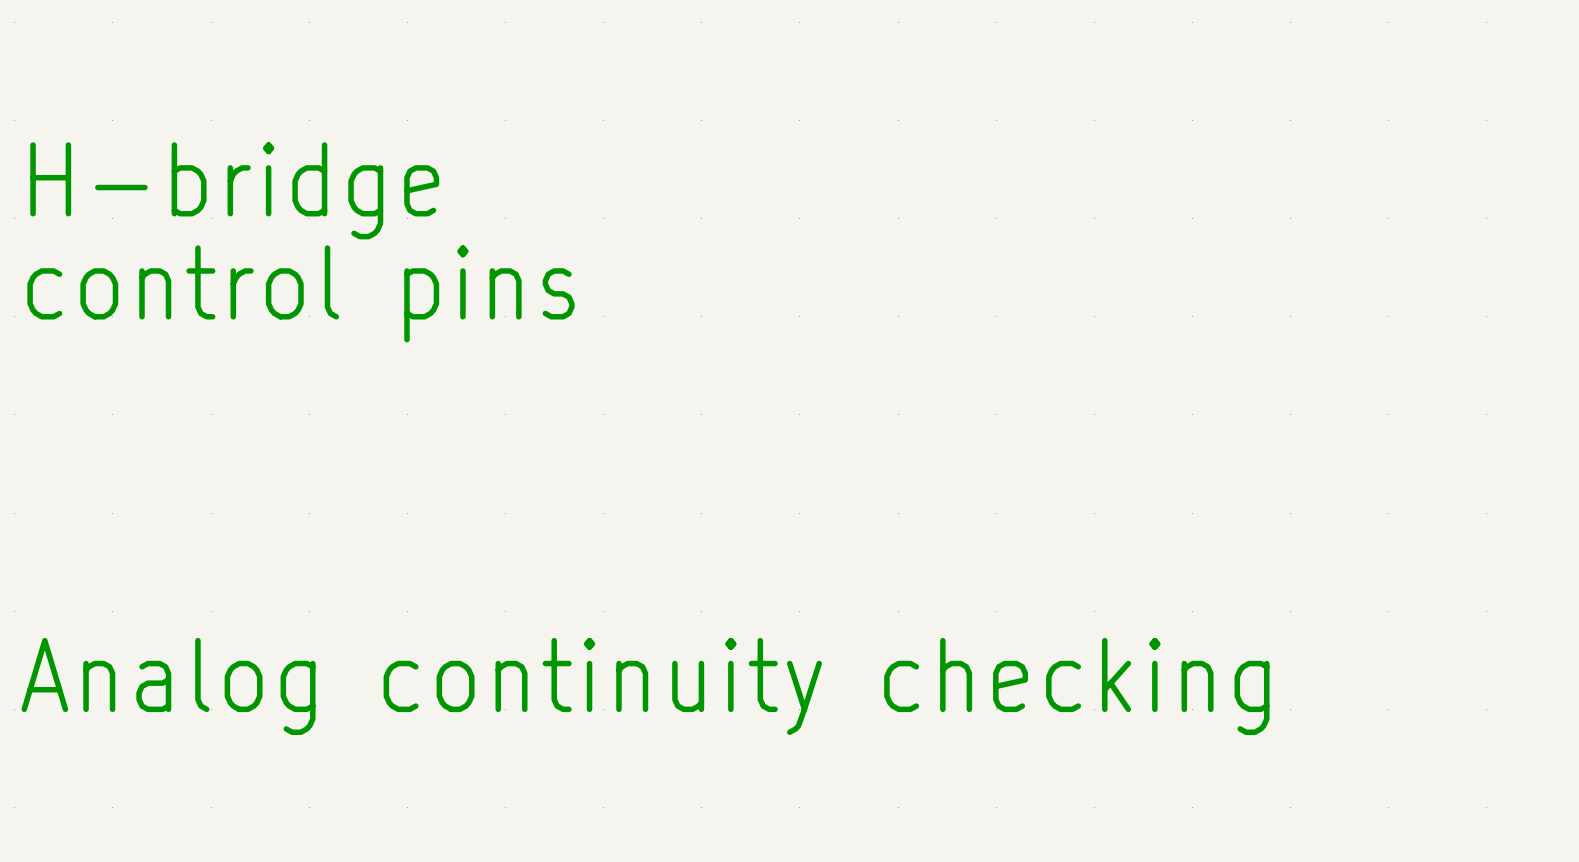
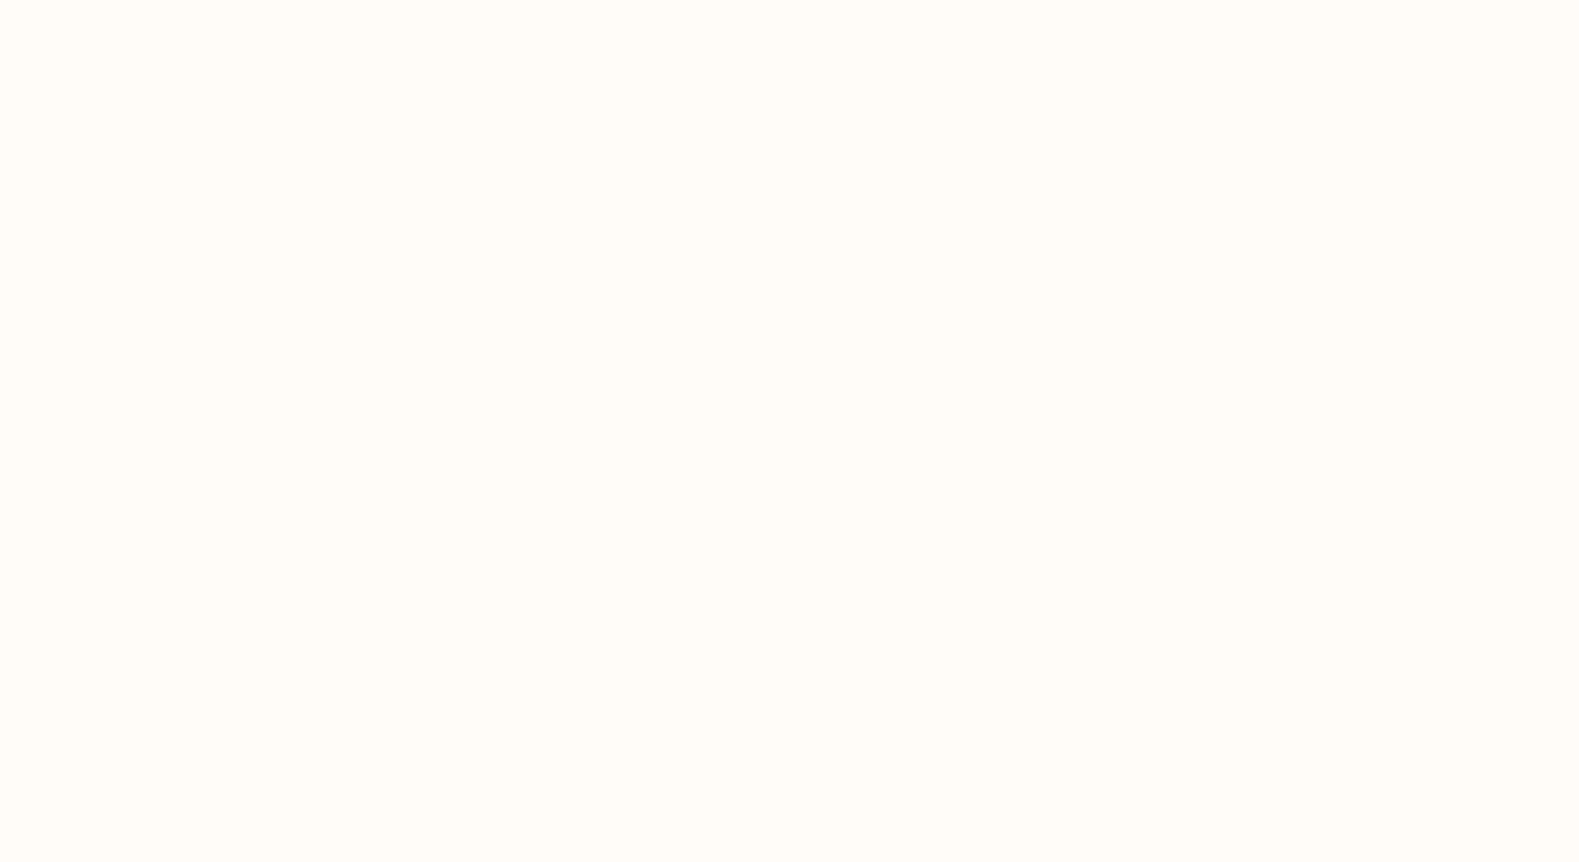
text: H-bridge (234, 190) -> none
text: control pins (301, 293) -> none
text: Analog continuity checking (645, 686) -> none

